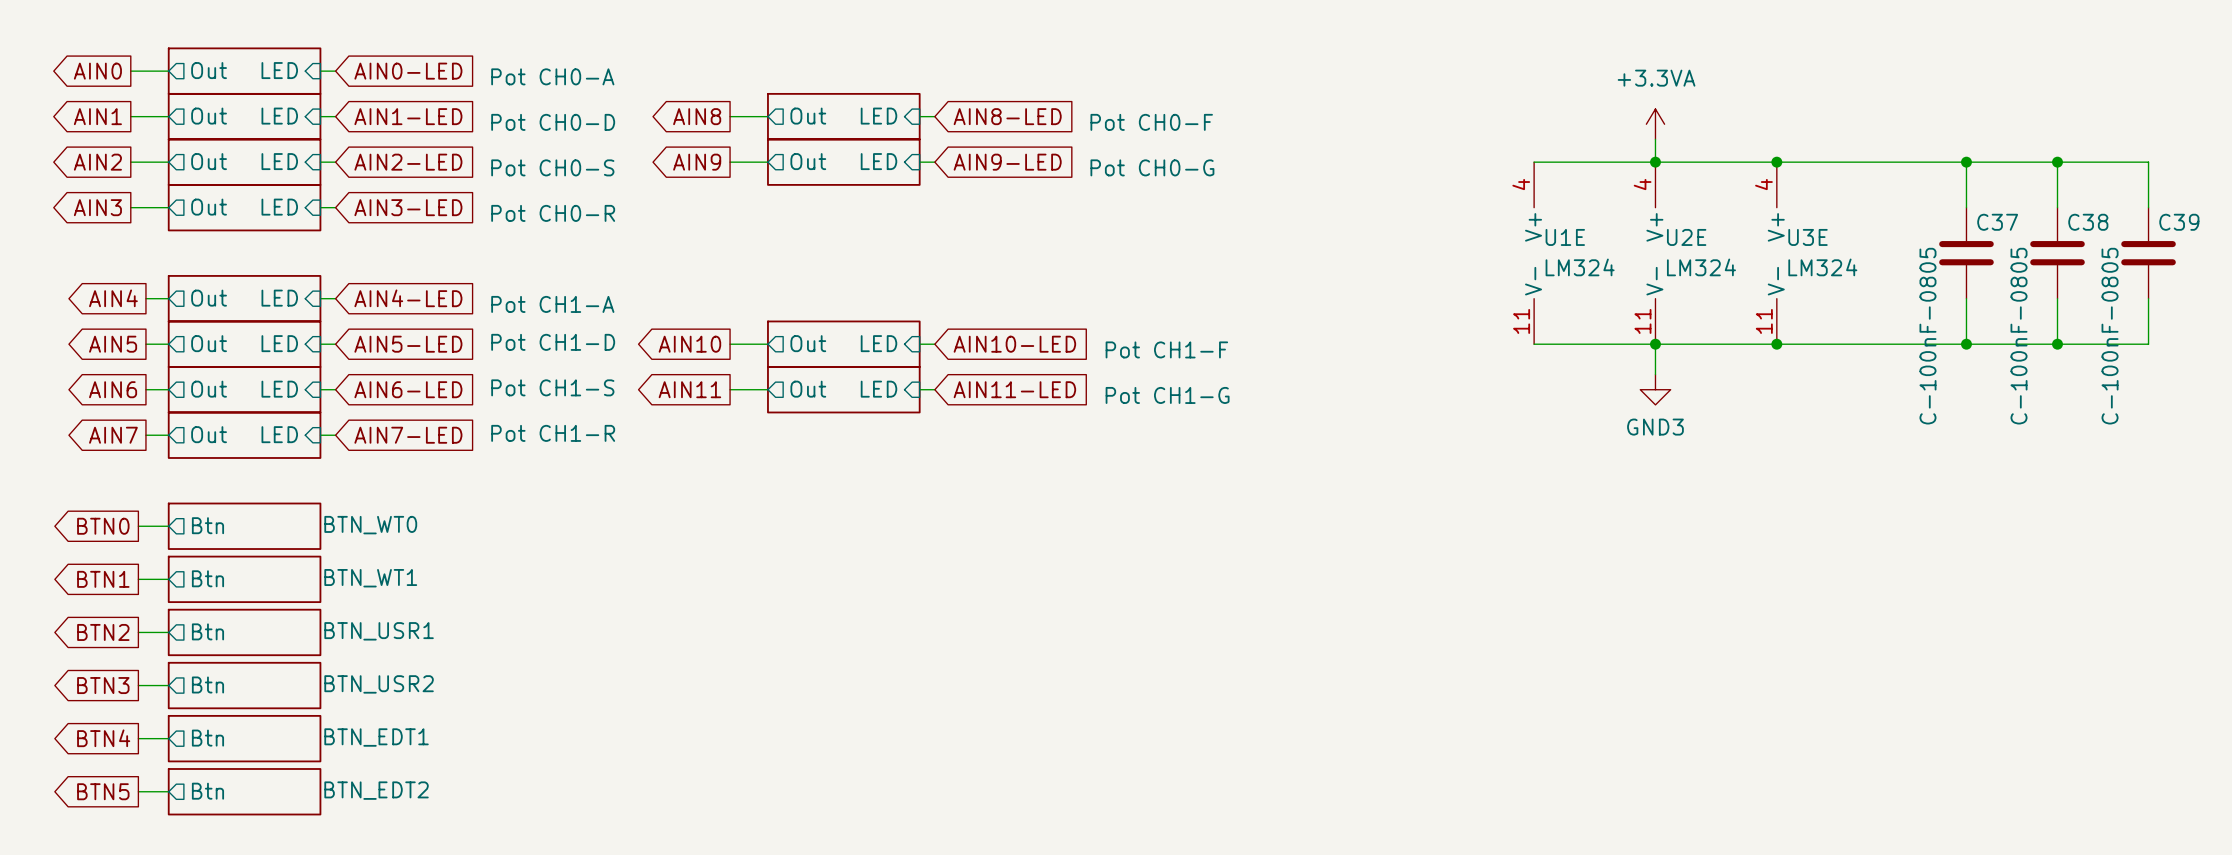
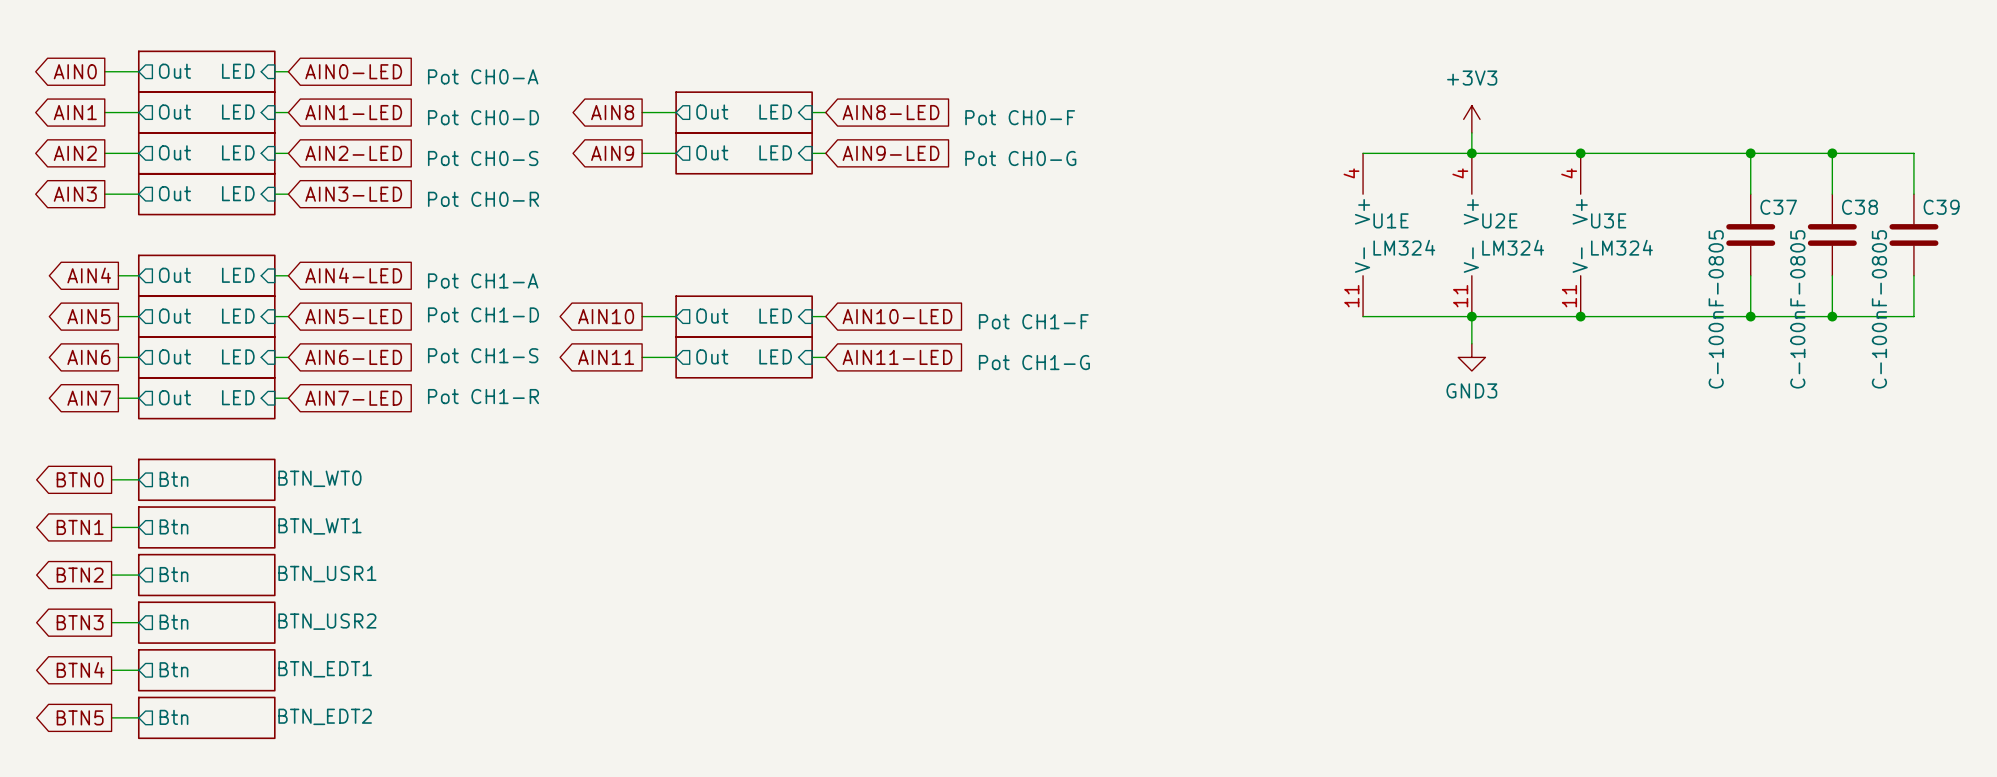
power symbol: +3.3VA (1655, 124) -> +3V3 (1471, 119)

